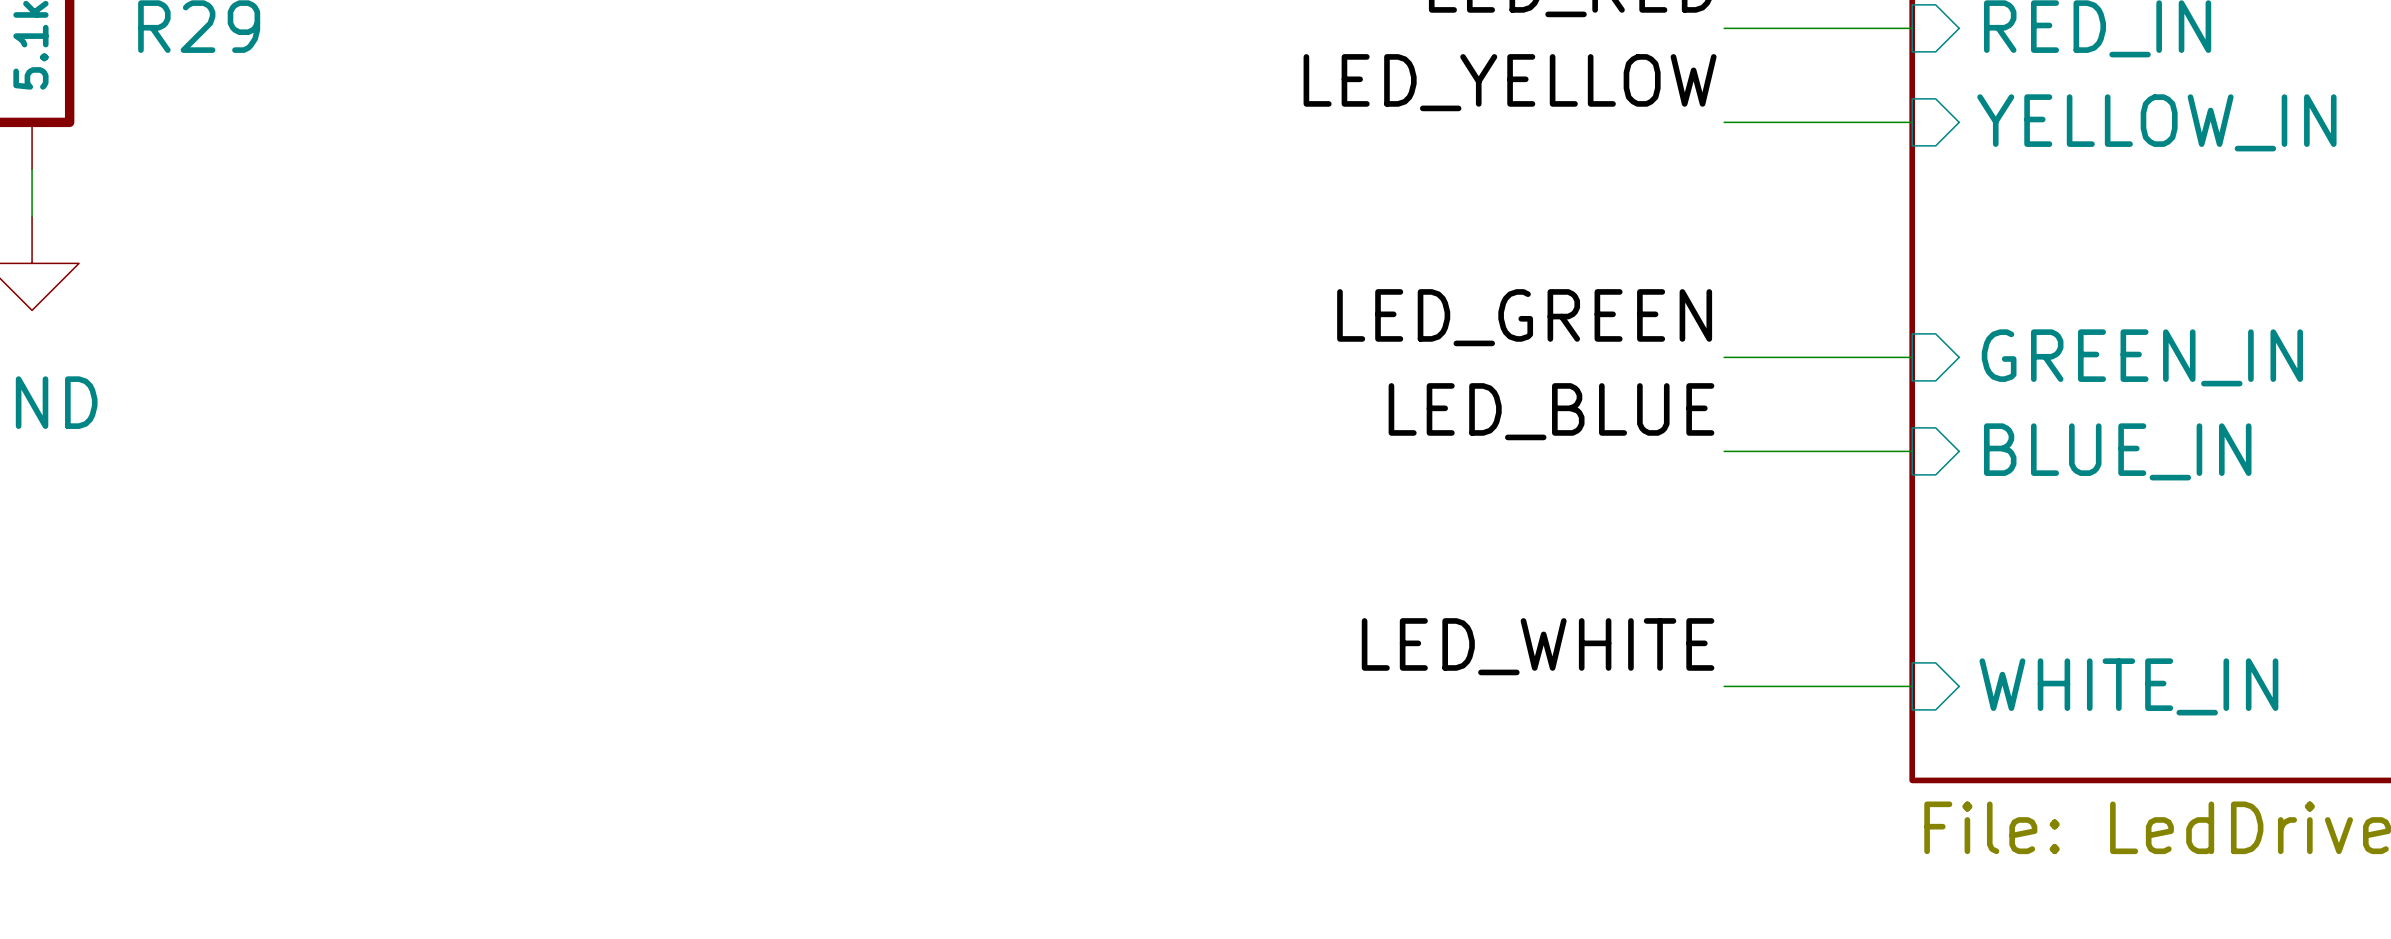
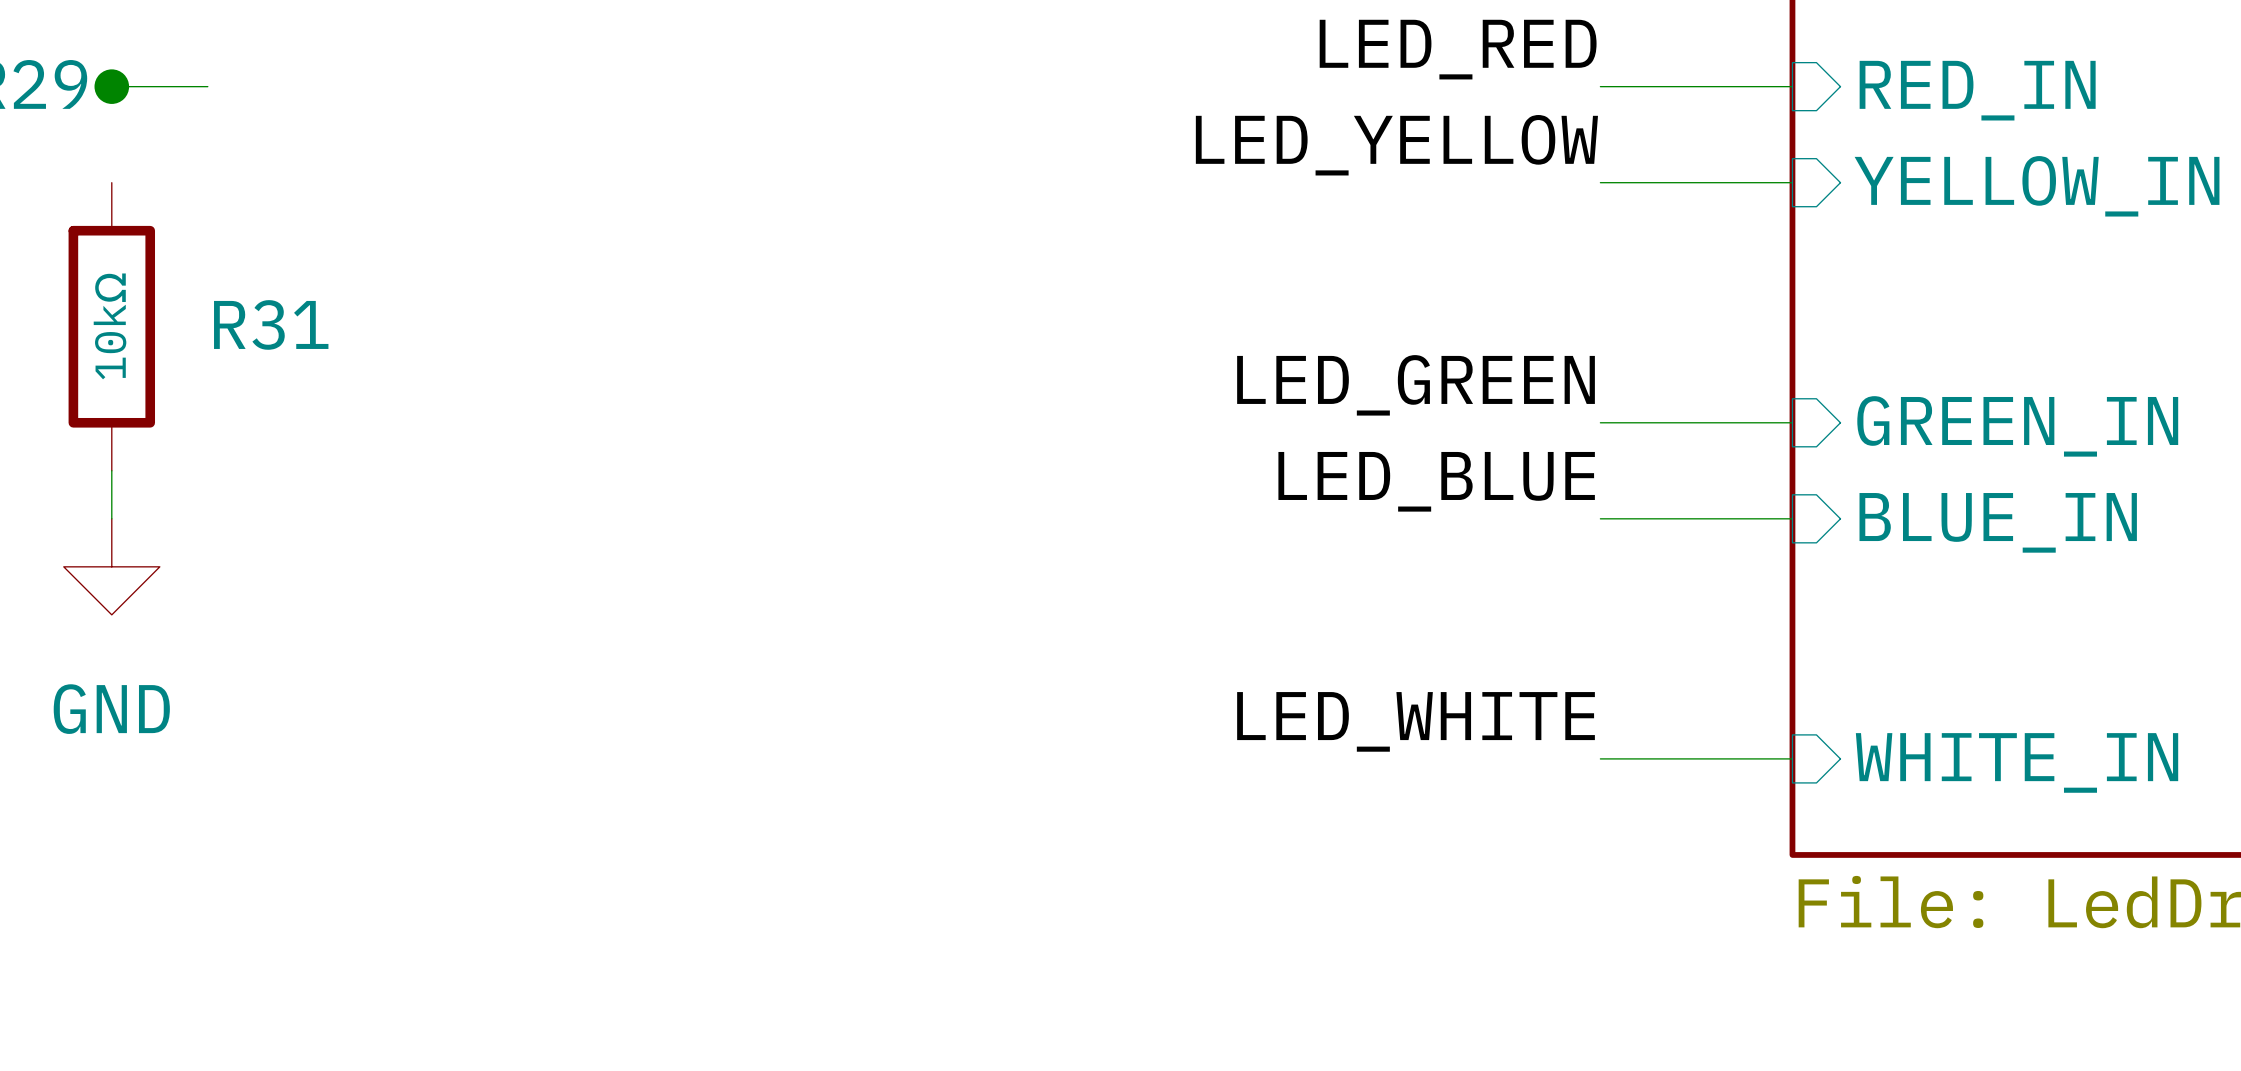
wire: none -> (111, 86) (207, 86)
junction: none -> (111, 86)
R31: none -> 10kΩ (111, 326)
wire: none -> (111, 470) (111, 518)
power symbol: none -> GND (111, 566)

